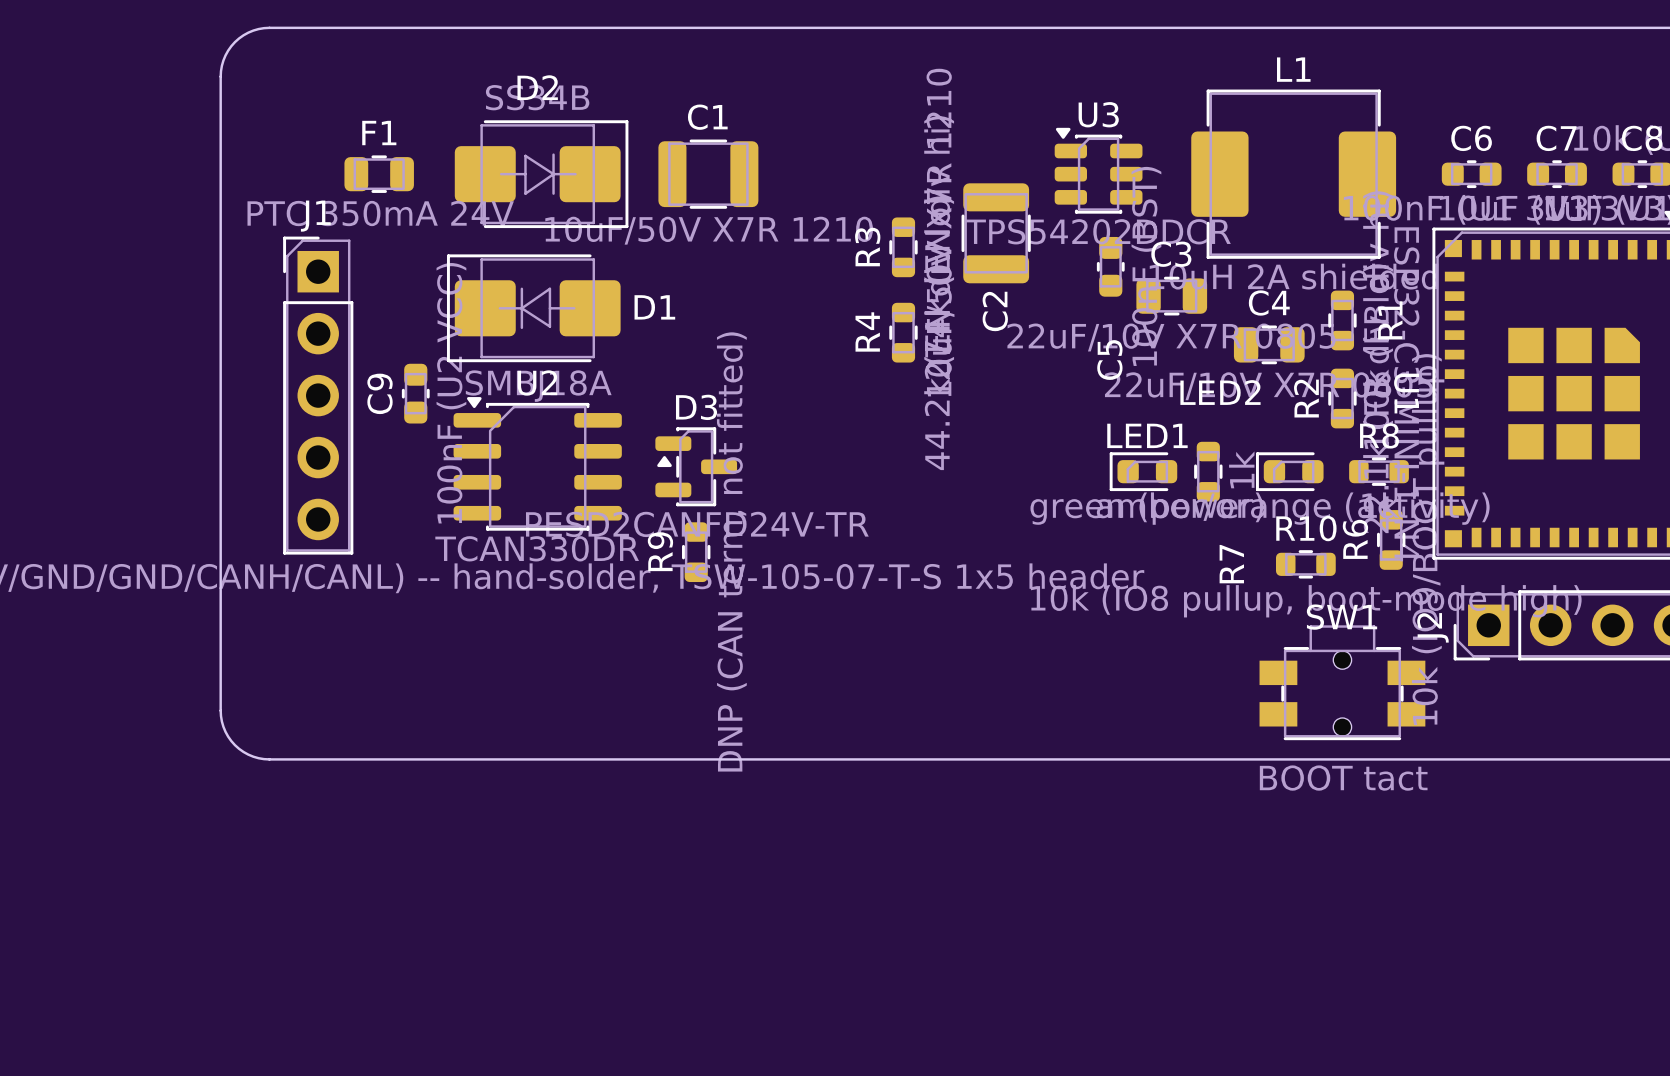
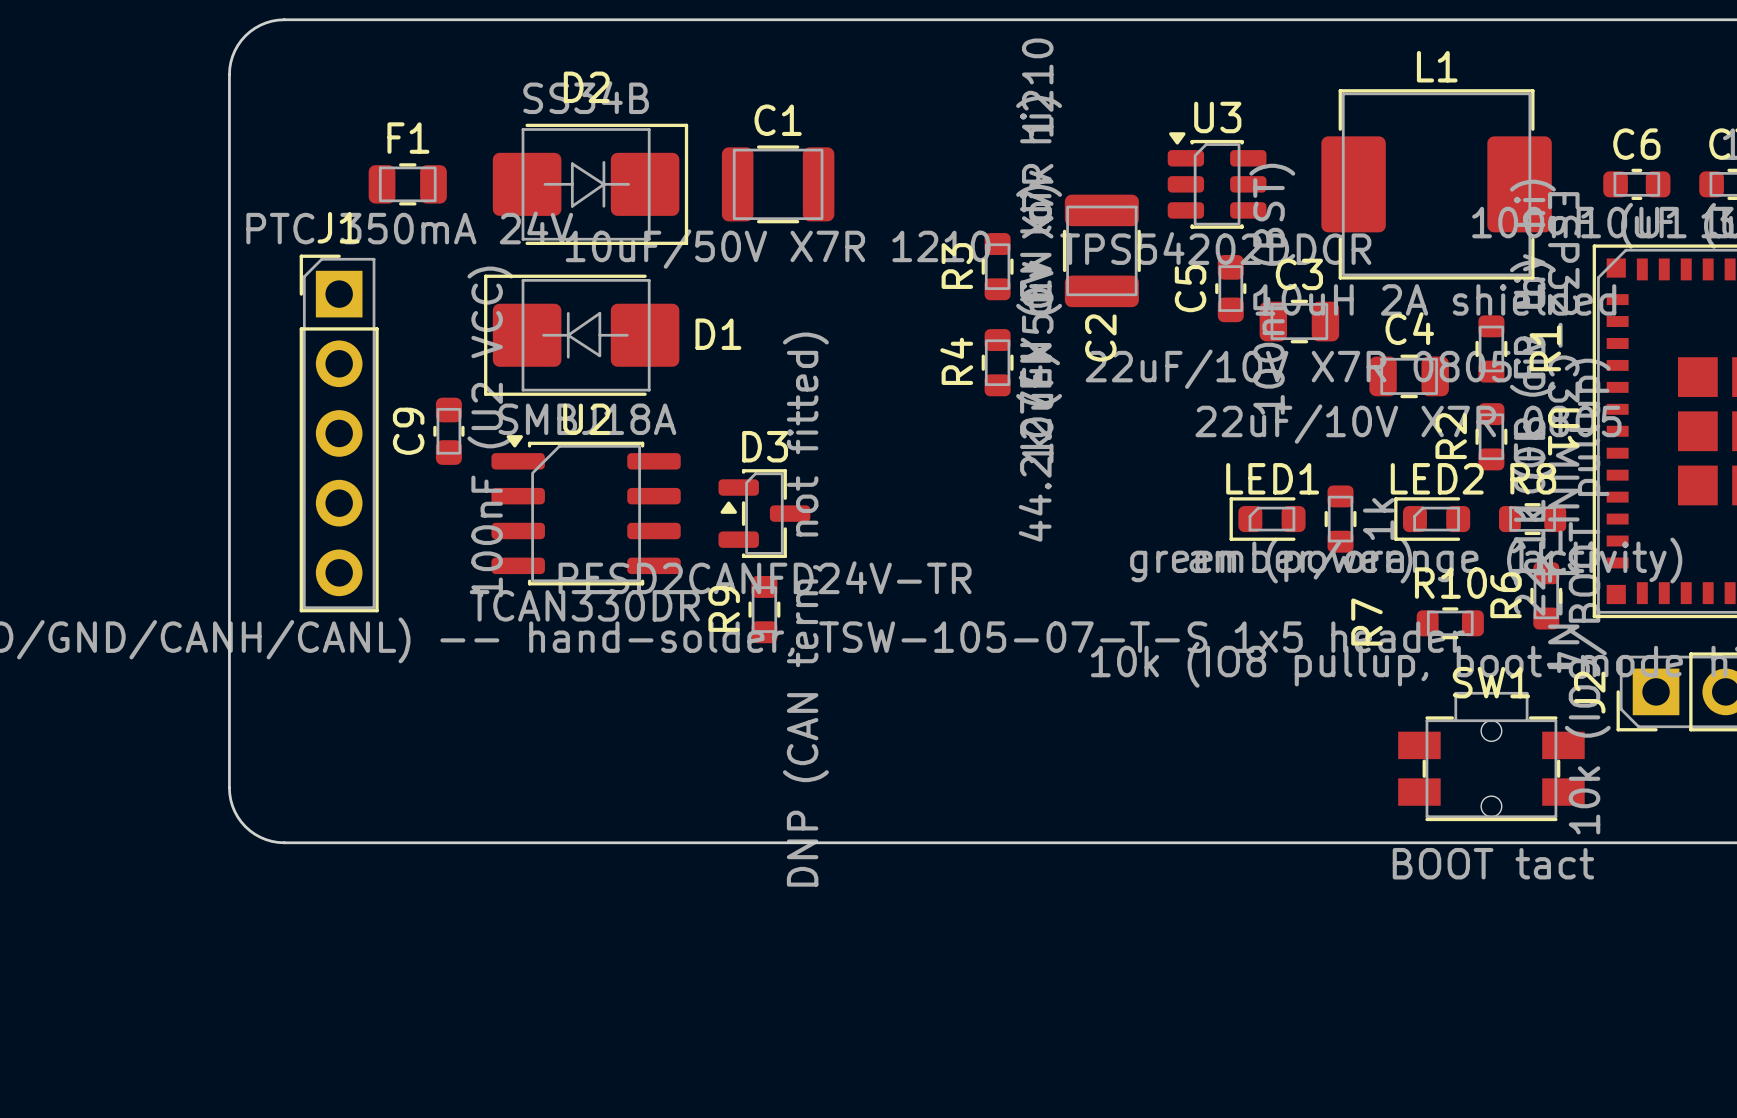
C5 name position: C5 (1109, 360) -> C5 (1190, 288)
LED2 name position: LED2 (1220, 392) -> LED2 (1437, 478)

